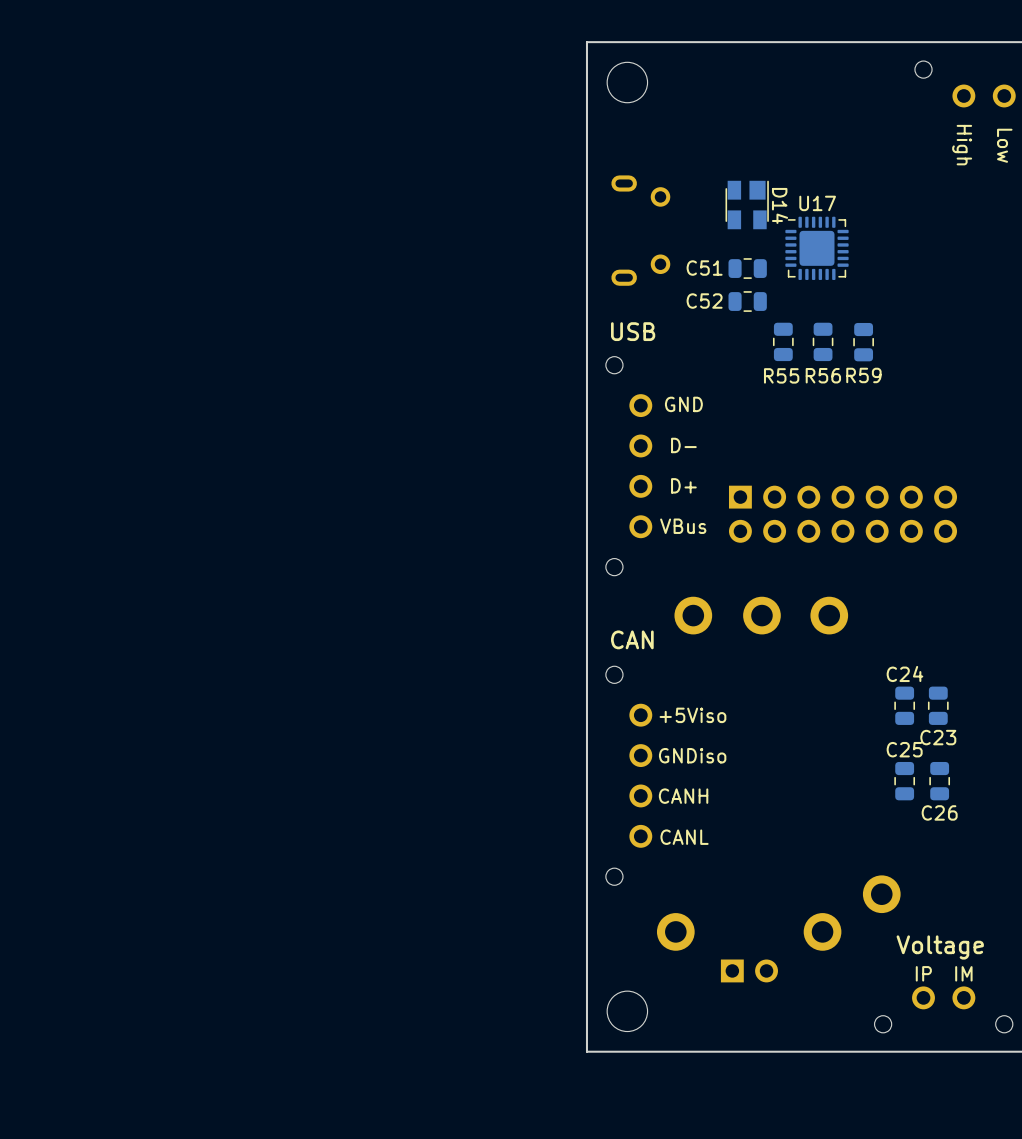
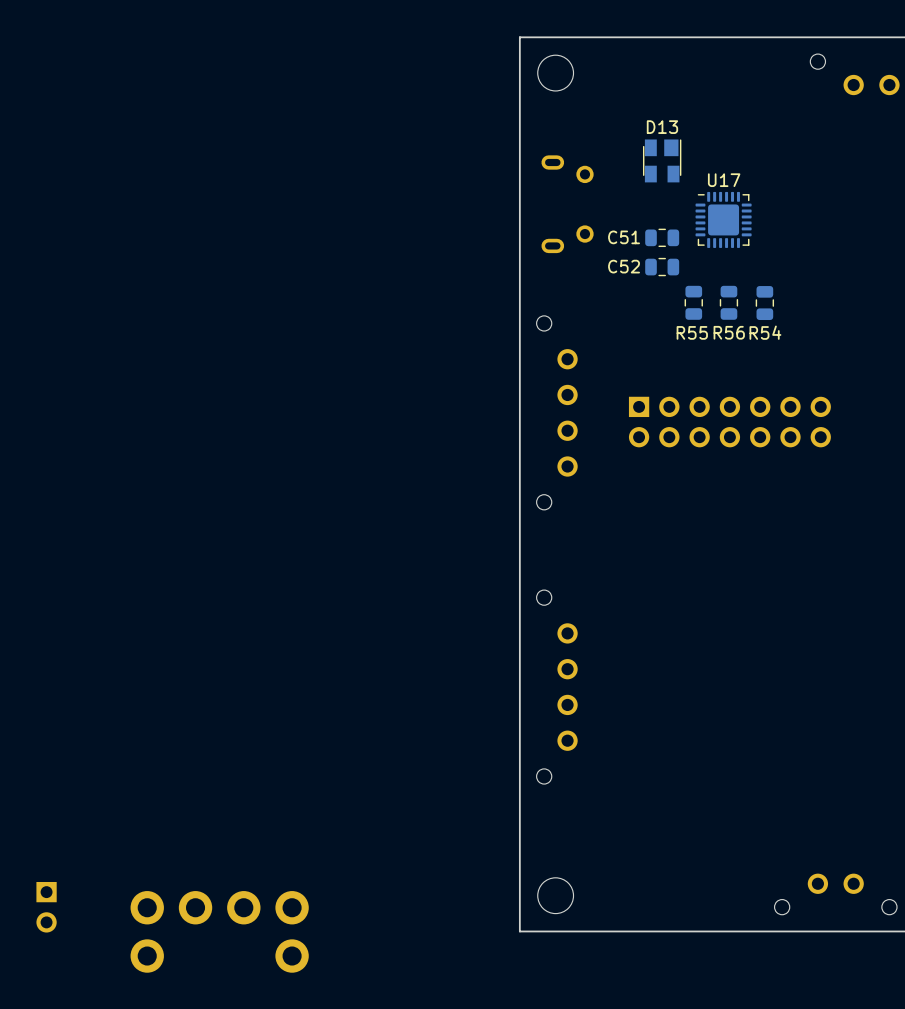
text: High (962, 145) -> none
text: Low (1004, 145) -> none
D13: none -> (662, 160)
D14: (747, 204) -> none
text: USB (633, 331) -> none
R59 name: R59 (863, 375) -> R54 (765, 332)
text: GND (683, 404) -> none
text: D- (683, 445) -> none
text: D+ (683, 485) -> none
part position: (843, 514) -> (729, 422)
text: VBus (683, 526) -> none
part: (693, 615) -> none
part: (761, 615) -> none
part: (829, 615) -> none
text: CAN (632, 639) -> none
C24: (904, 705) -> none
C23: (938, 705) -> none
text: +5Viso (692, 715) -> none
text: GNDiso (692, 755) -> none
C25: (904, 781) -> none
C26: (939, 781) -> none
text: CANH (683, 796) -> none
text: CANL (684, 837) -> none
part: (881, 894) -> none
part: (675, 931) -> none
part: (822, 931) -> none
text: Voltage (940, 947) -> none
part: (749, 970) -> none
text: IP (923, 973) -> none
text: IM (963, 973) -> none
part: none -> (46, 907)
part: none -> (147, 907)
part: none -> (195, 907)
part: none -> (243, 907)
part: none -> (292, 907)
part: none -> (147, 956)
part: none -> (292, 956)

